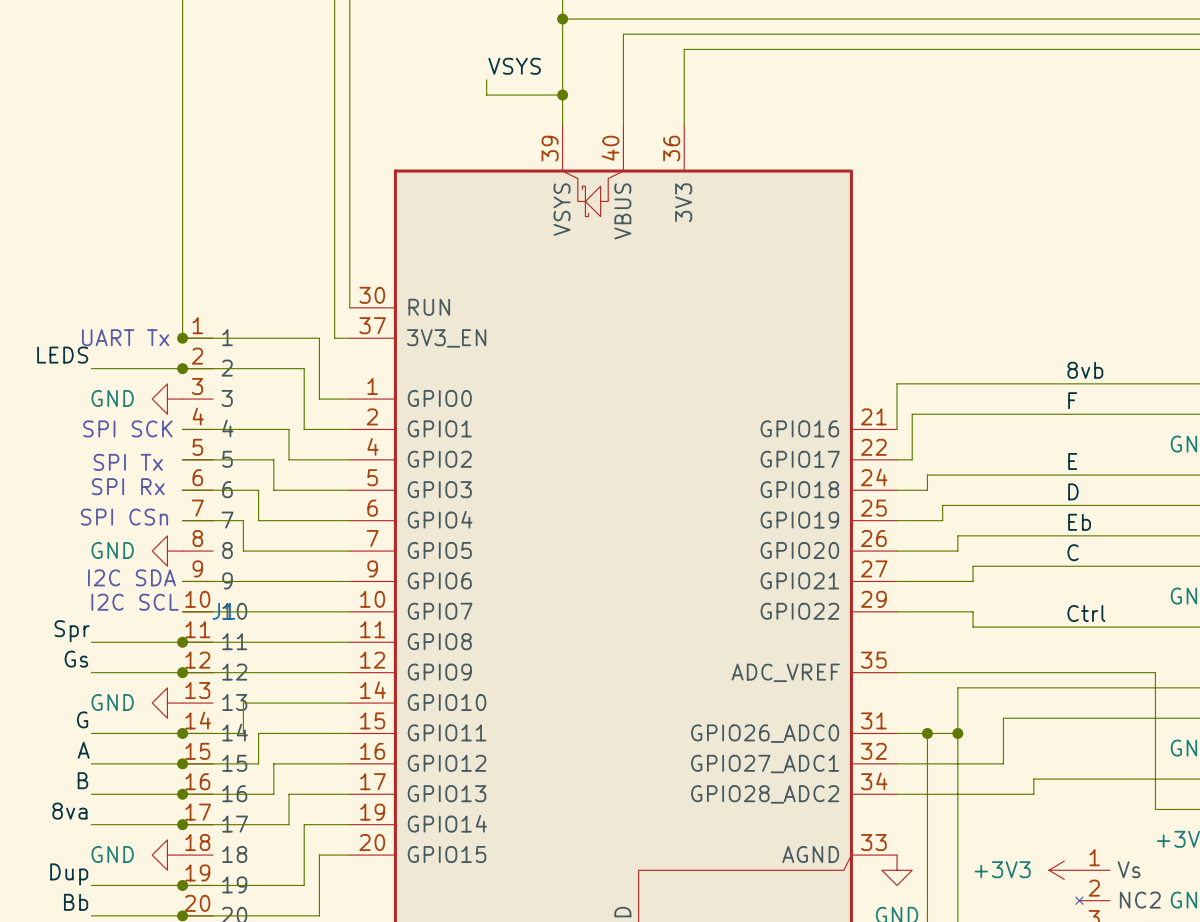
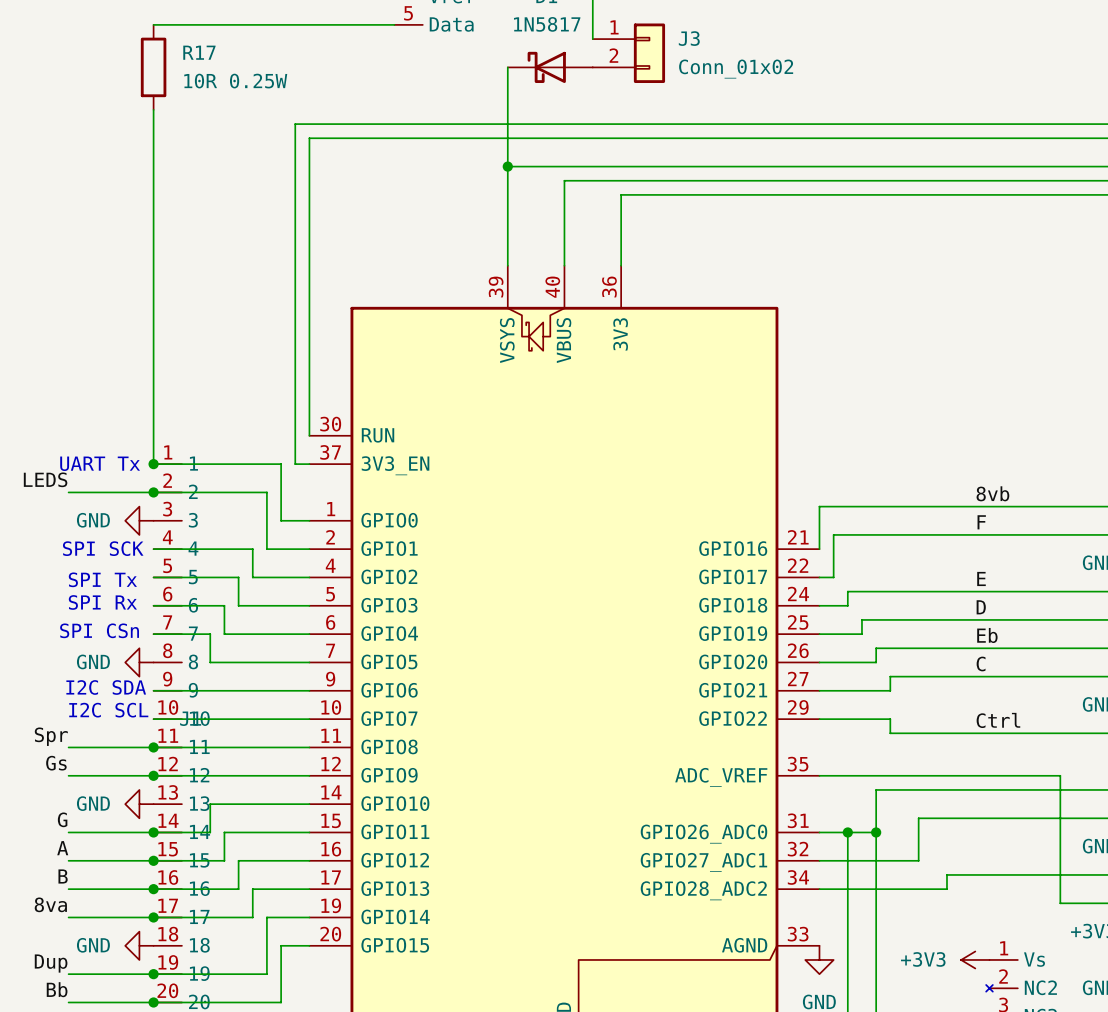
label: VSYS (514, 66) -> none
wire: (486, 79) (486, 95) (562, 95) -> none
junction: (562, 95) -> none

